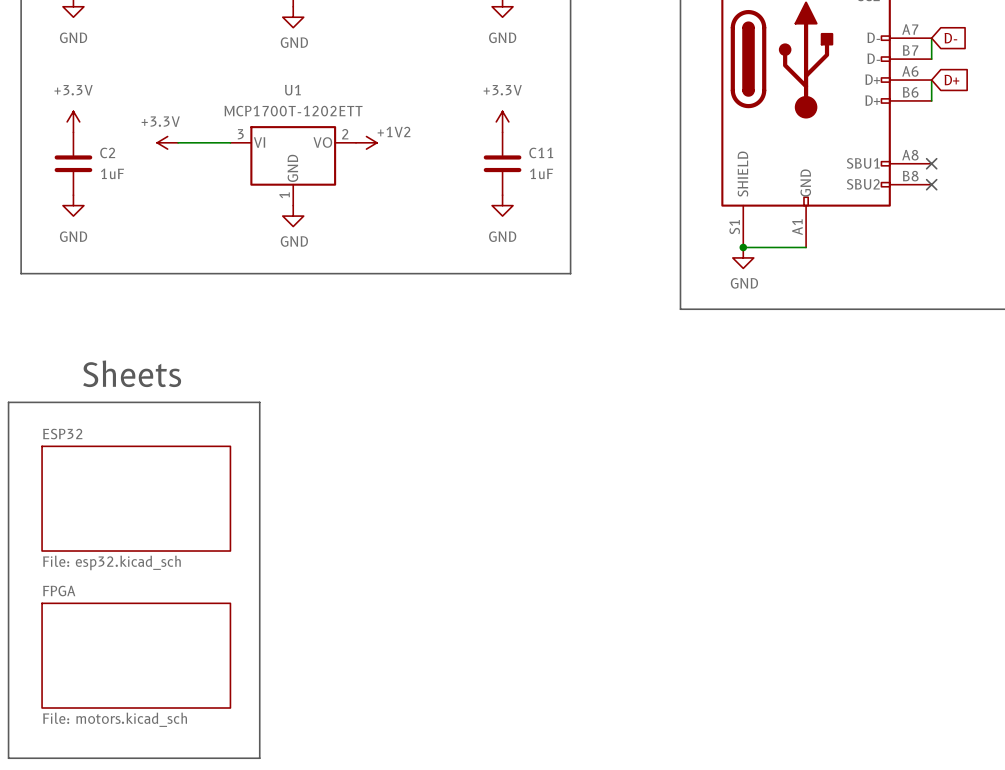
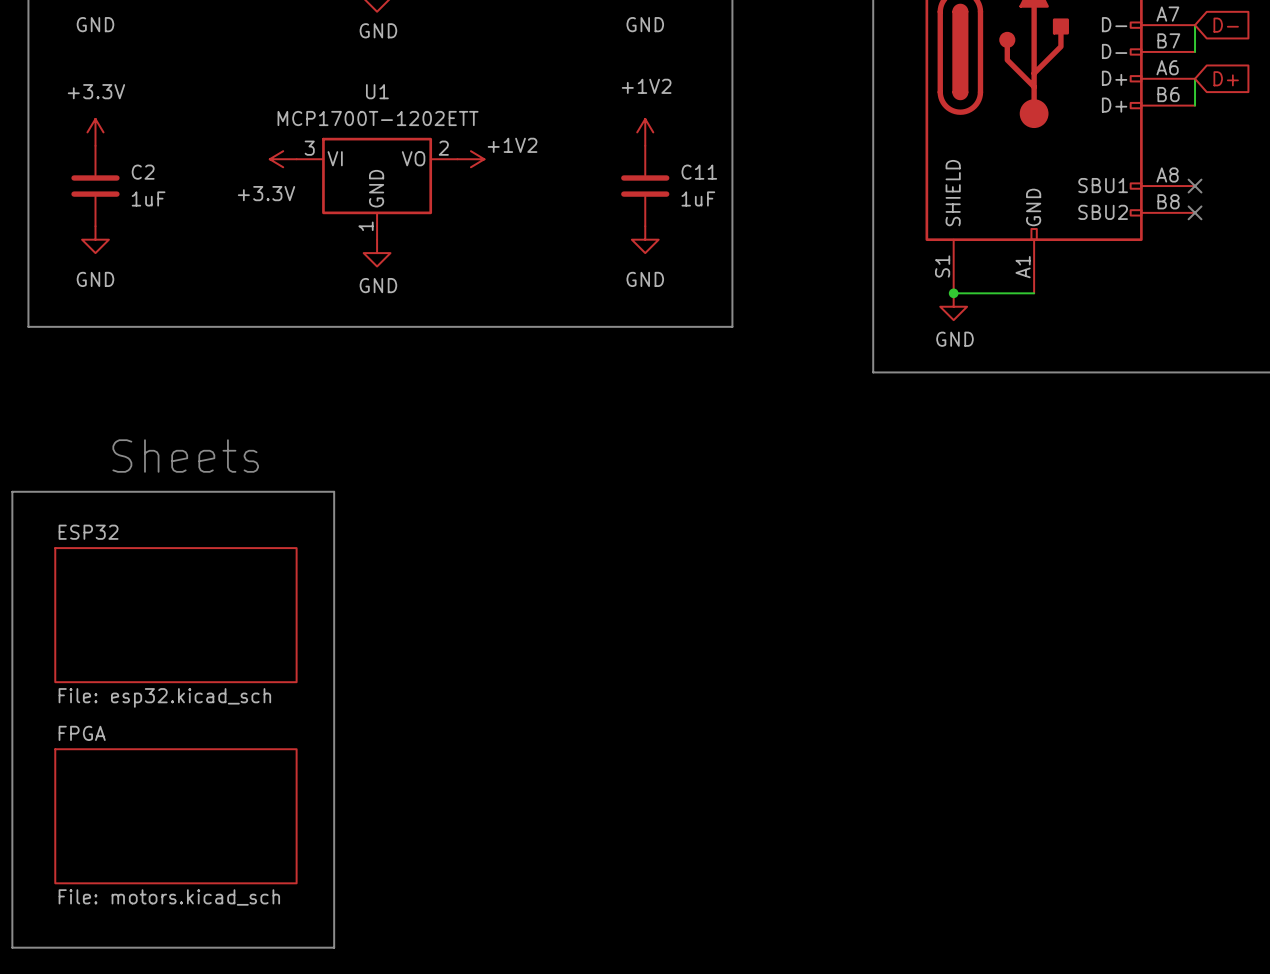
power symbol text position: +3.3V (160, 121) -> +3.3V (266, 193)
power symbol: +3.3V (502, 121) -> +1V2 (645, 132)
power symbol position: +3.3V (167, 142) -> +3.3V (283, 159)
wire: (178, 142) (230, 142) -> none

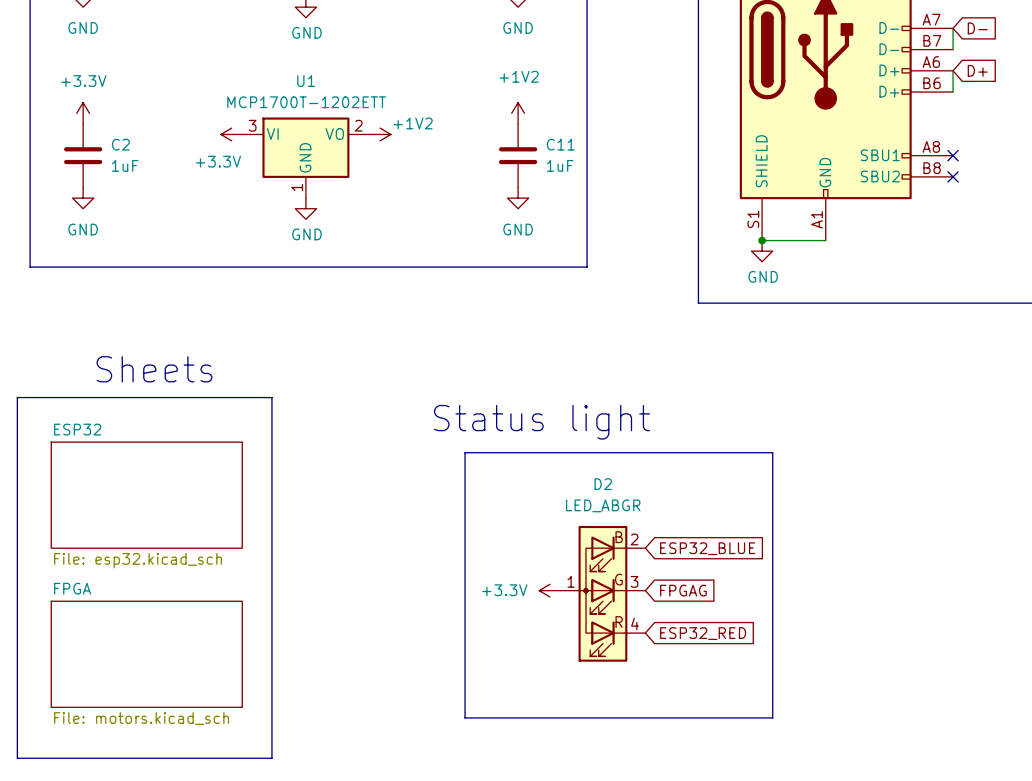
text: none -> Status light (541, 422)
line: none -> (465, 452) (465, 717) (772, 717) (772, 452) (465, 452)
global label: none -> ESP32_BLUE (707, 548)
power symbol: none -> +3.3V (549, 590)
global label: none -> FPGAG (683, 590)
D2: none -> LED_ABGR (602, 593)
global label: none -> ESP32_RED (703, 633)

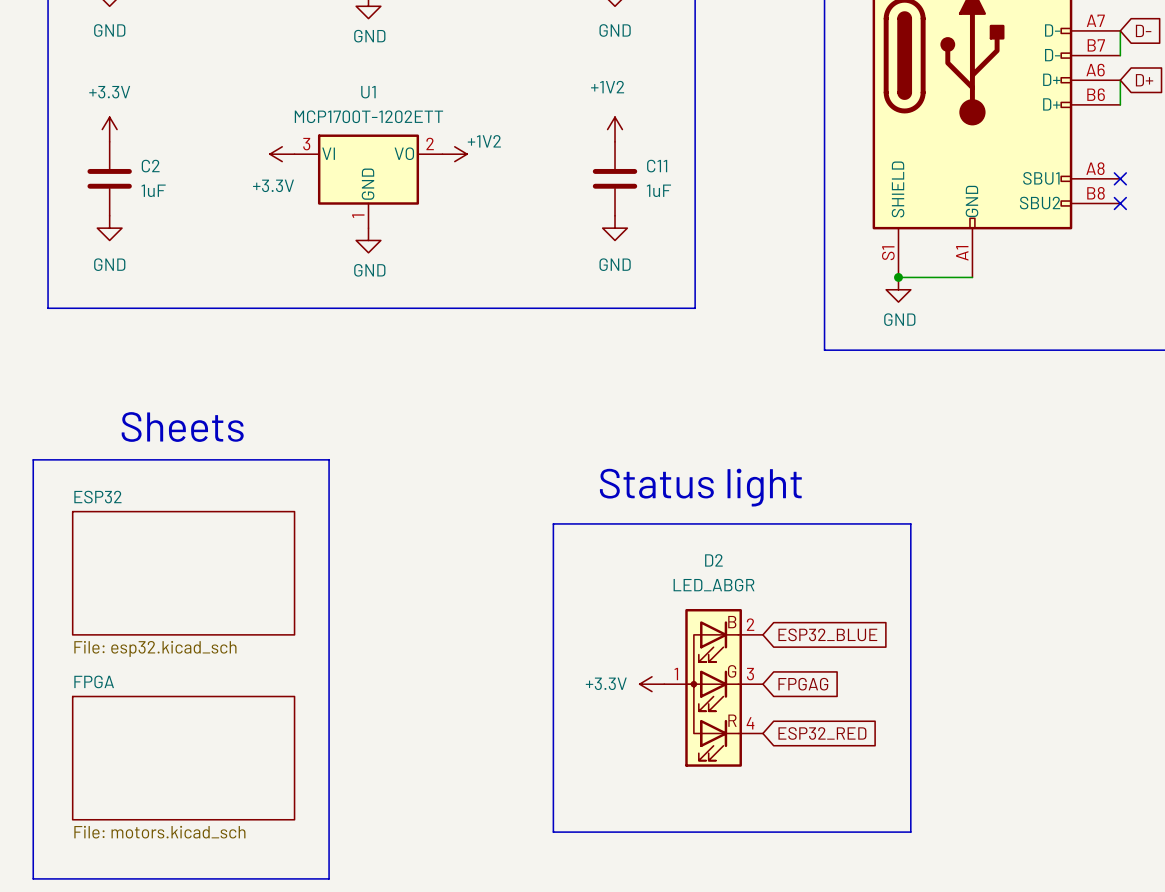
text position: Status light (541, 422) -> Status light (700, 487)

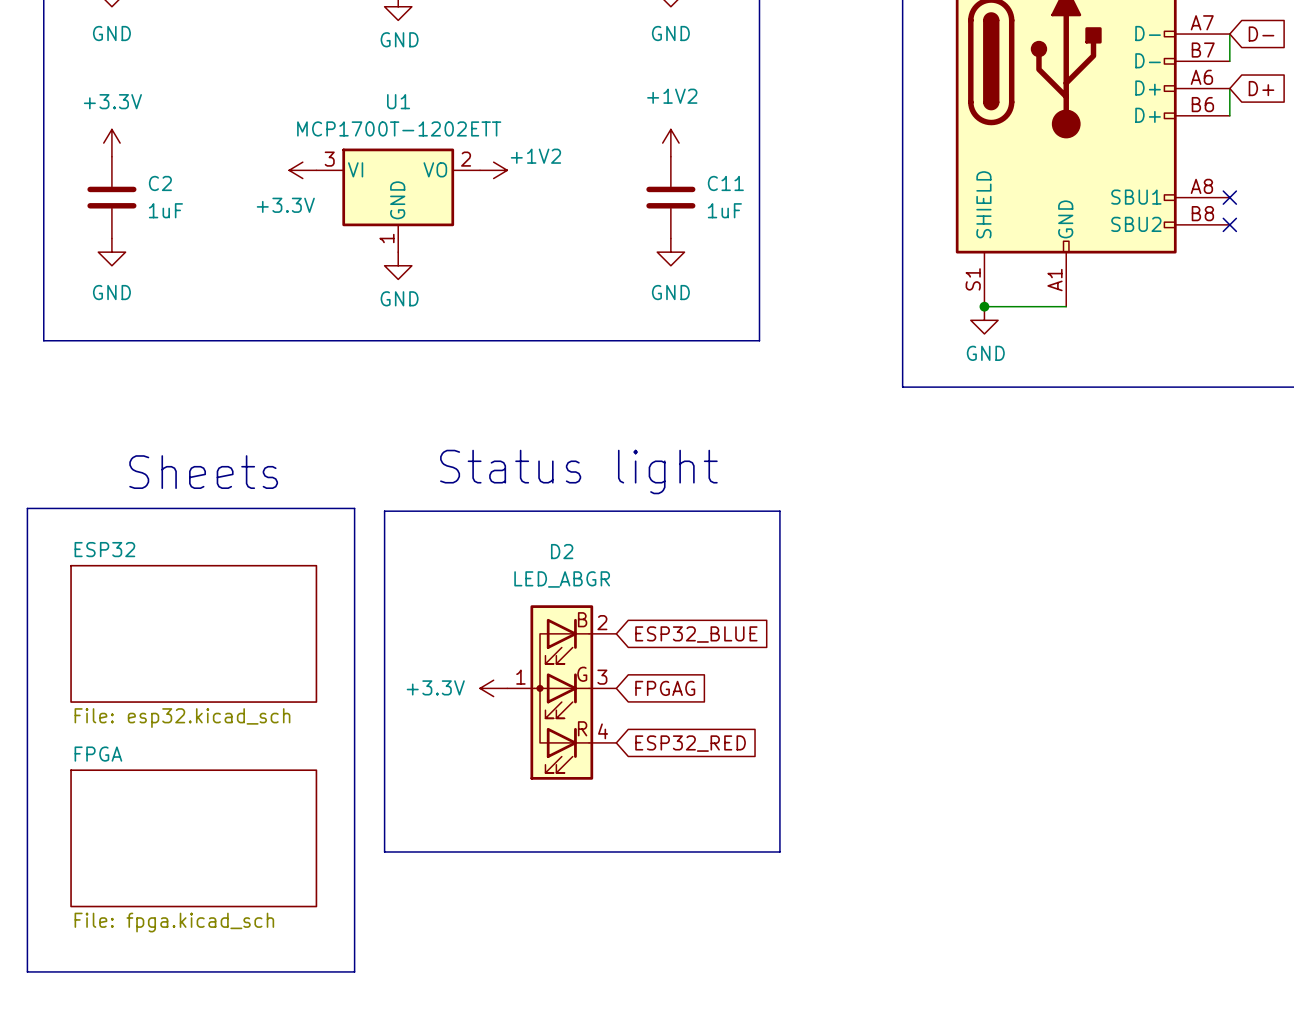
text position: Status light (700, 487) -> Status light (578, 472)
line: (553, 523) (553, 832) (910, 832) (910, 523) (553, 523) -> (384, 511) (384, 851) (779, 851) (779, 511) (384, 511)
global label position: ESP32_BLUE (827, 634) -> ESP32_BLUE (696, 634)
power symbol position: +3.3V (651, 684) -> +3.3V (493, 688)
global label position: FPGAG (803, 684) -> FPGAG (665, 688)
D2 position: (713, 687) -> (561, 692)
global label position: ESP32_RED (822, 733) -> ESP32_RED (690, 743)
sheet FPGA value: File: motors.kicad_sch (159, 832) -> File: fpga.kicad_sch (174, 922)

